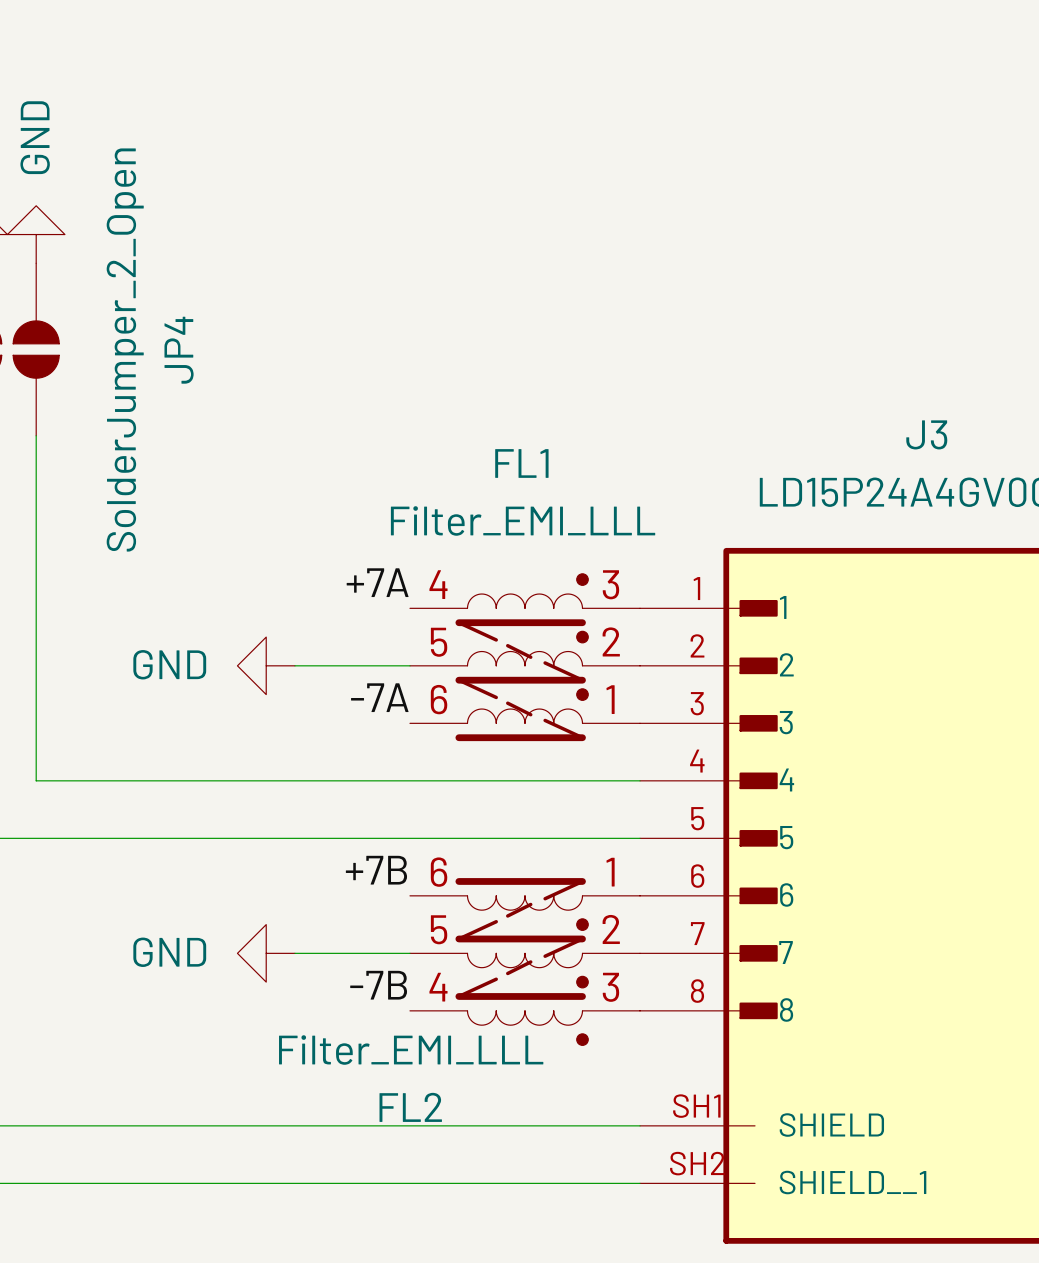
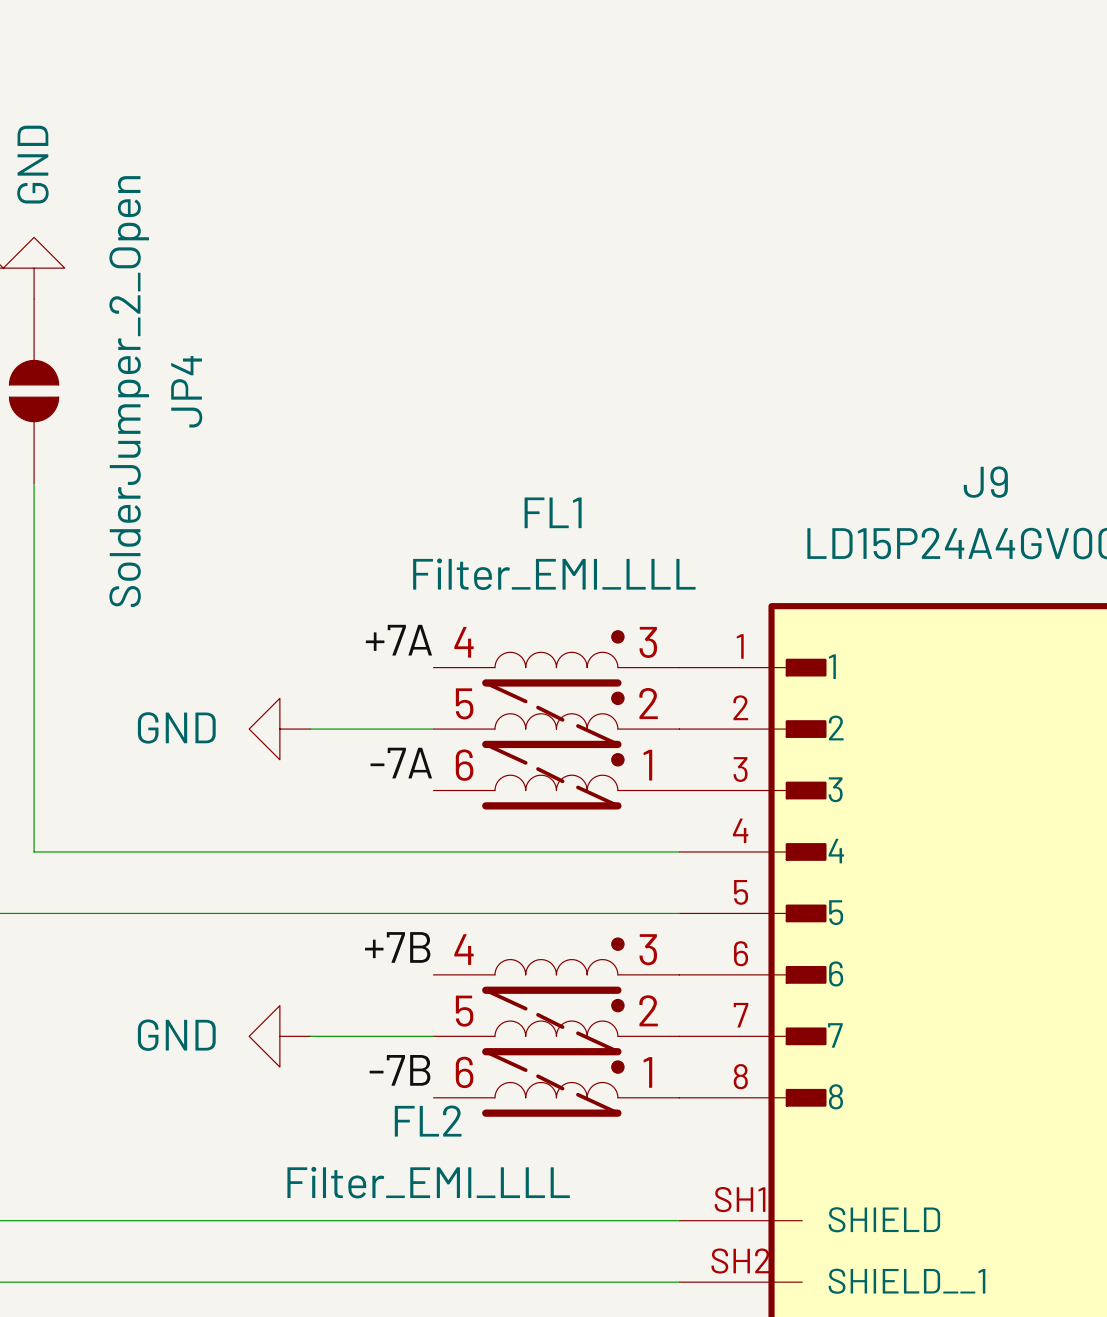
J3 name: J3 (926, 434) -> J9 (985, 482)
FL2 flip: as is (521, 961) -> up-down (553, 1027)
FL2 value position: Filter_EMI_LLL (411, 1050) -> Filter_EMI_LLL (428, 1182)
FL2 name position: FL2 (410, 1107) -> FL2 (428, 1121)

